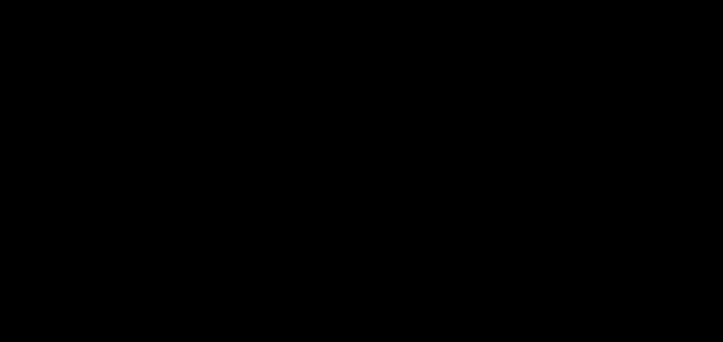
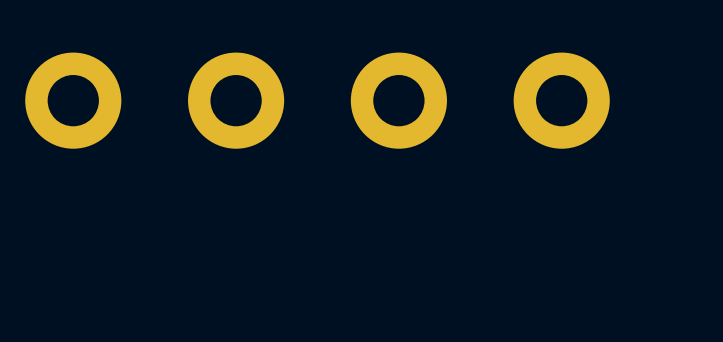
part: none -> (317, 100)

